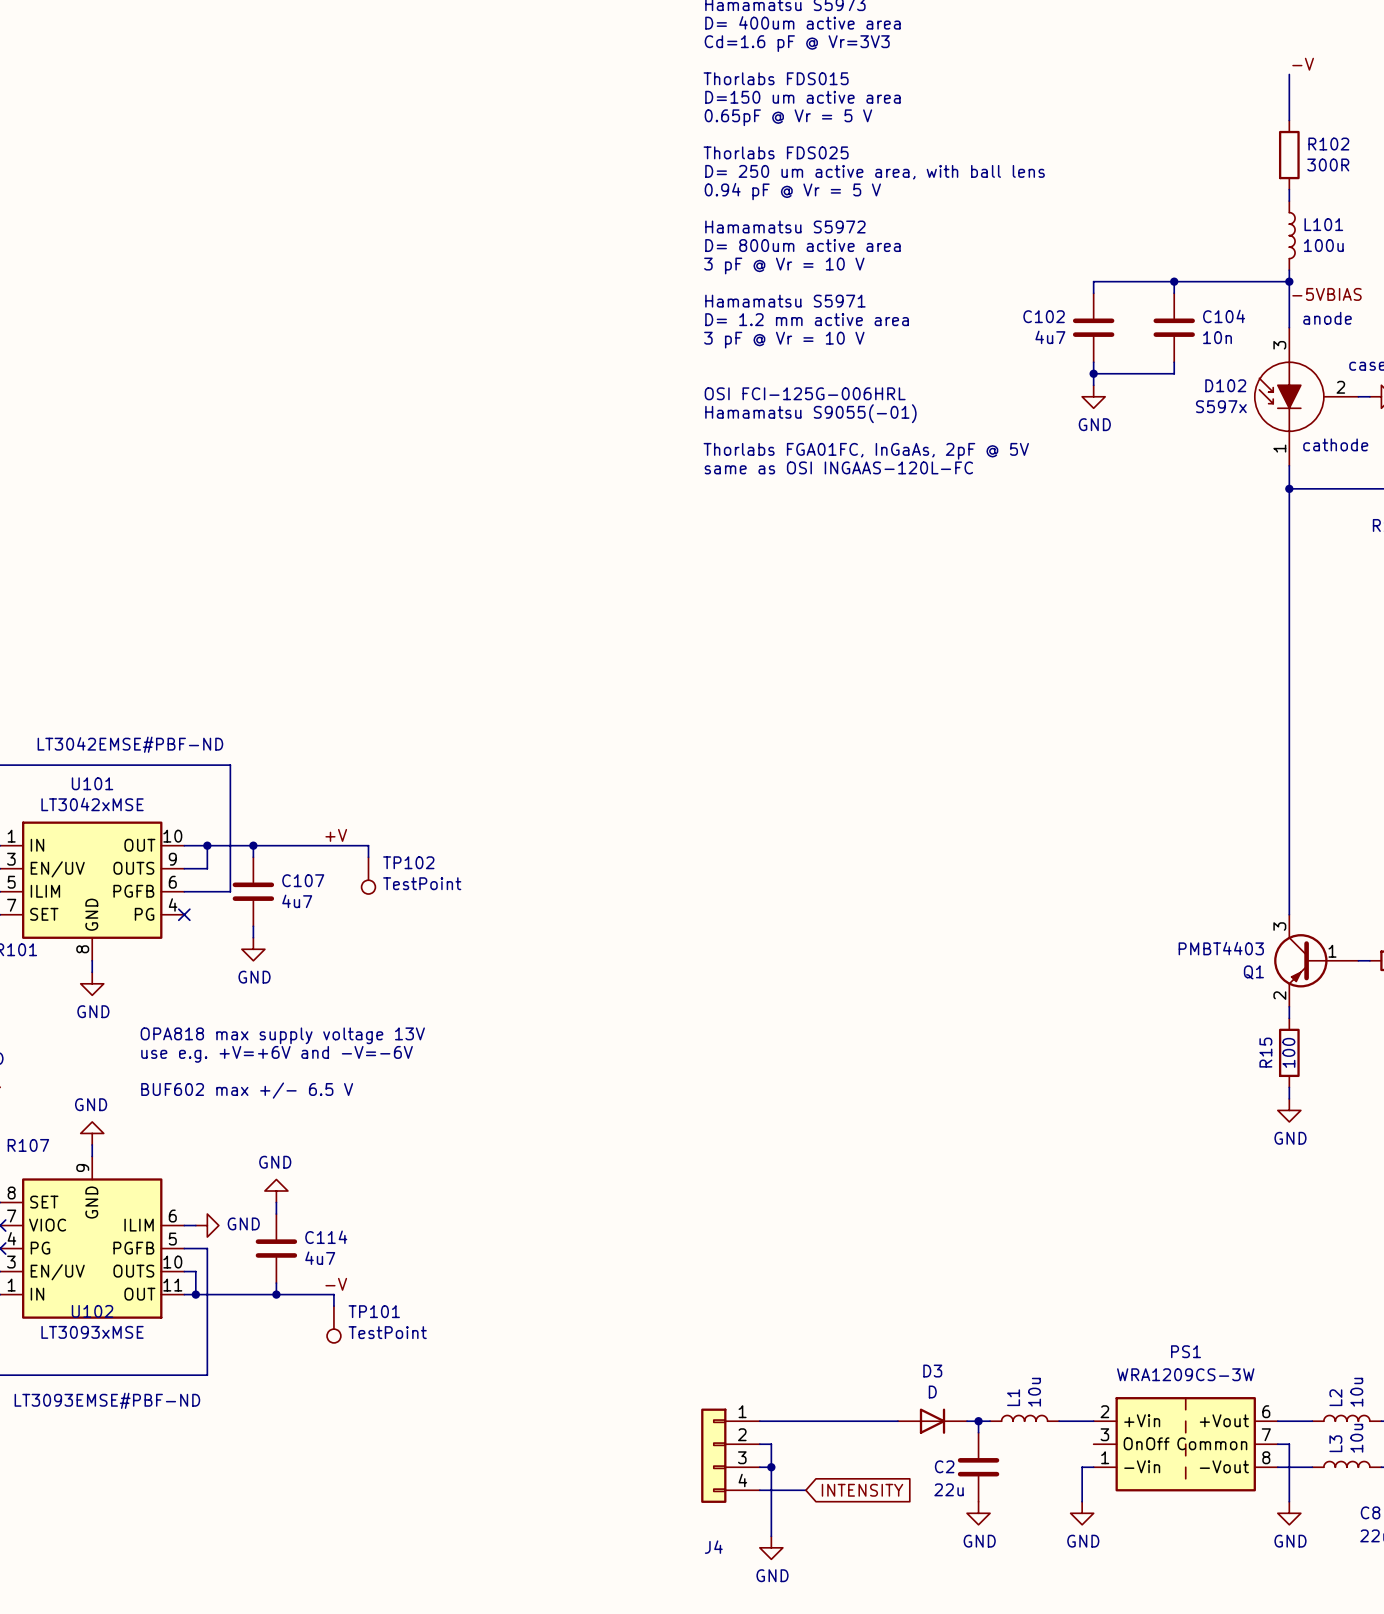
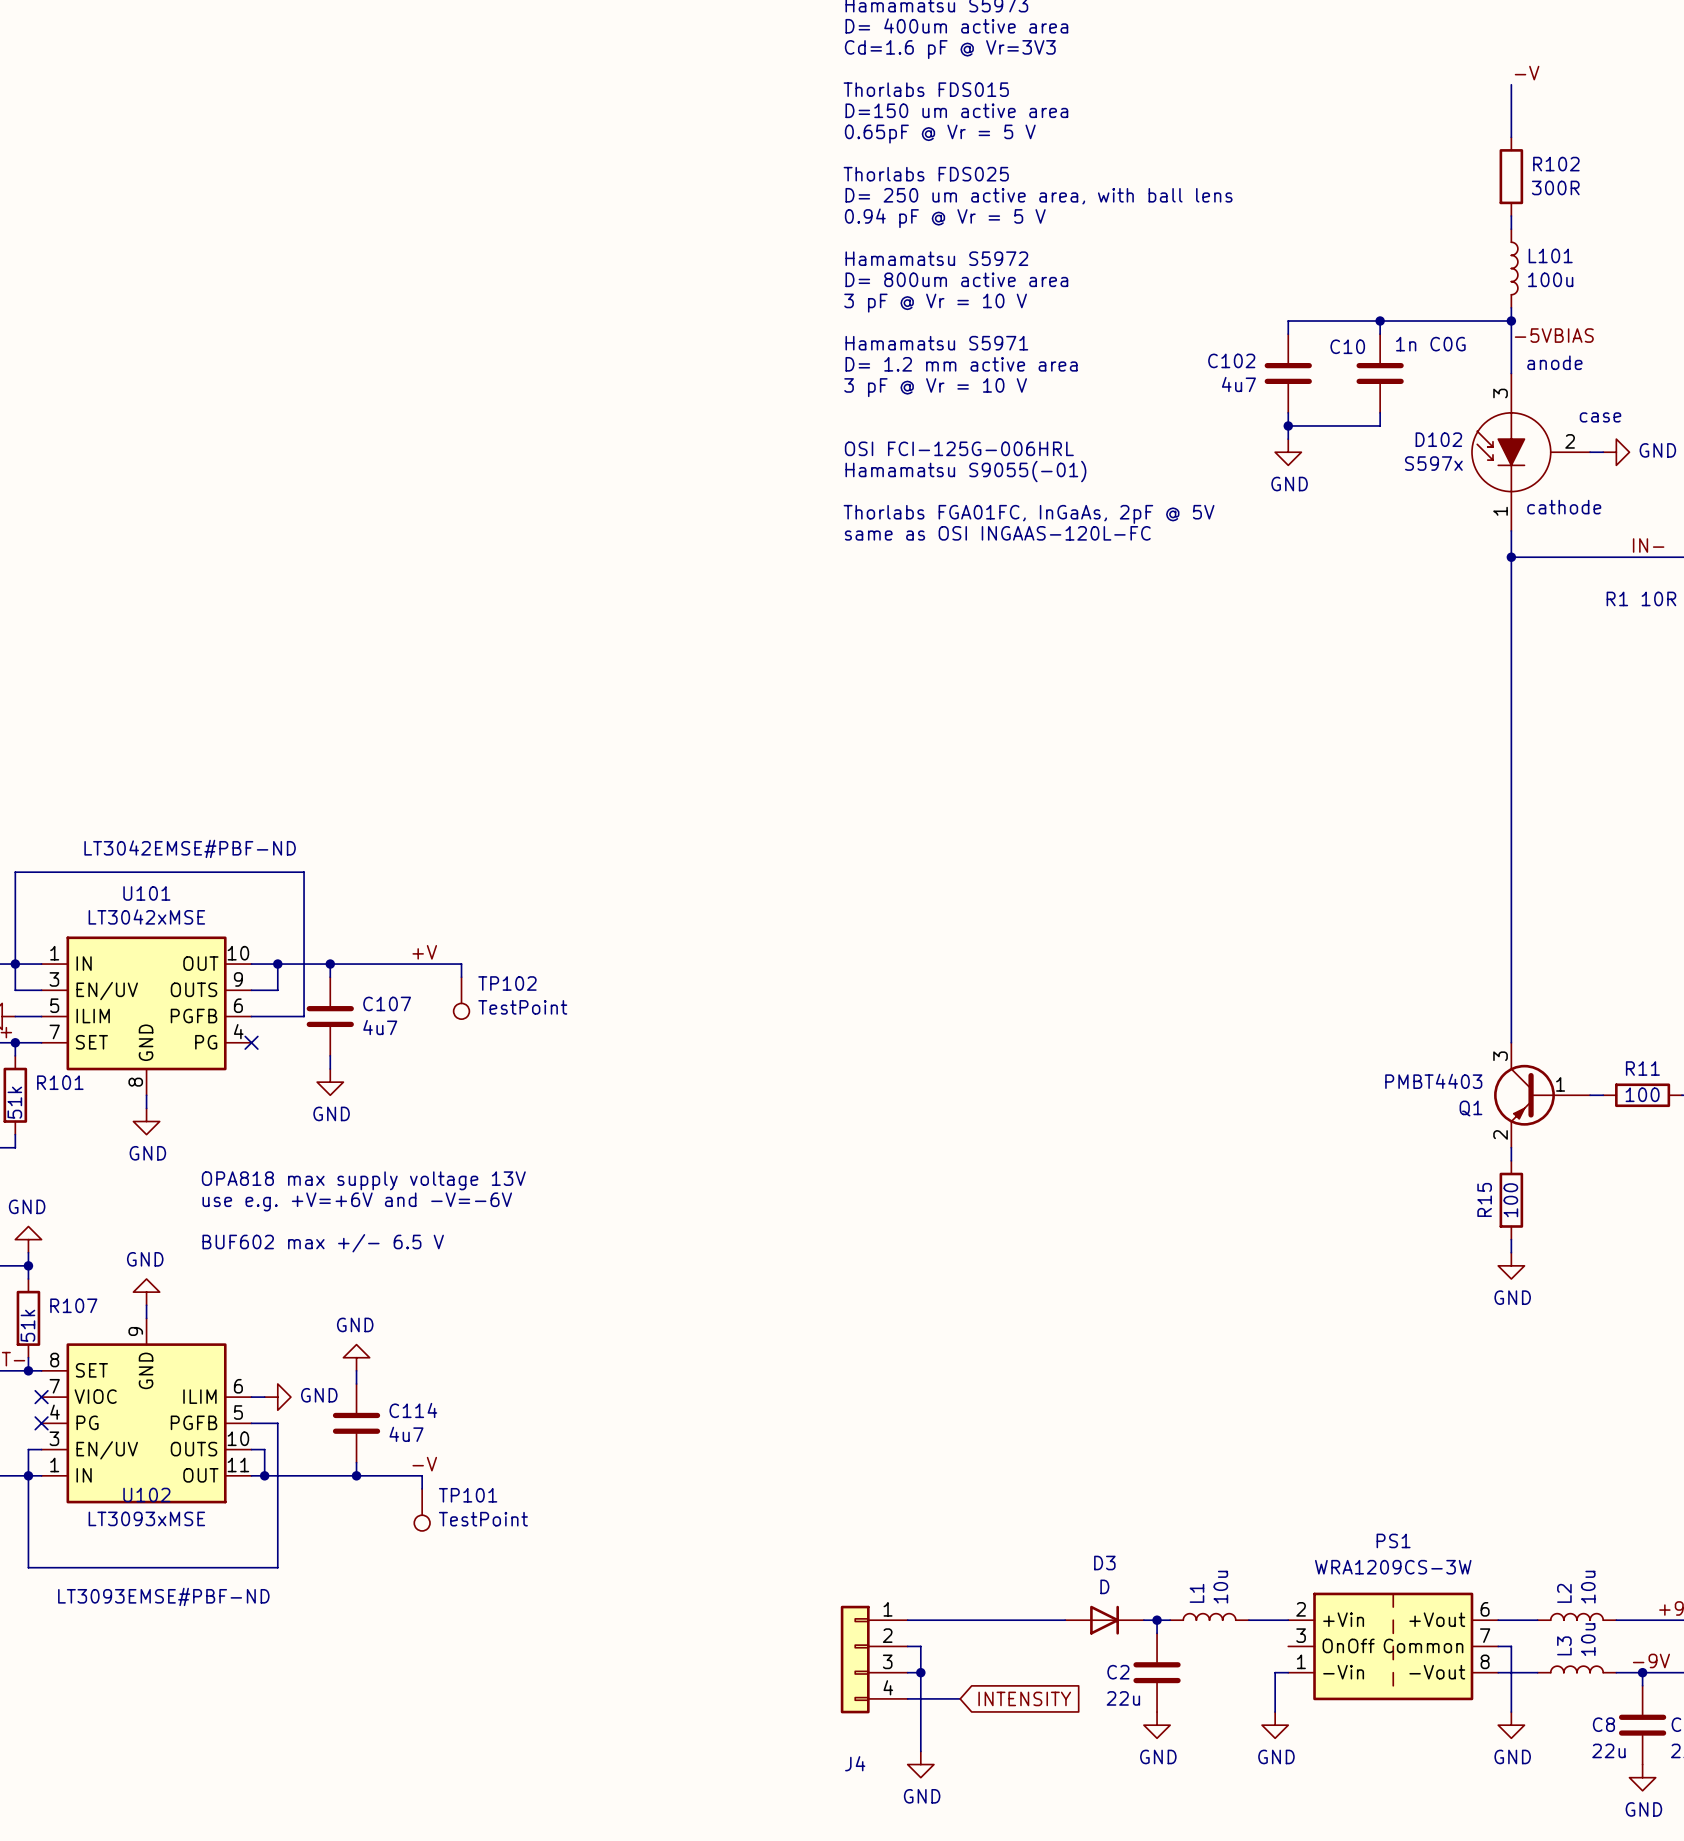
C104 name: C104 (1224, 316) -> C10 (1347, 346)
C104 value: 10n (1217, 337) -> 1n C0G (1430, 344)

